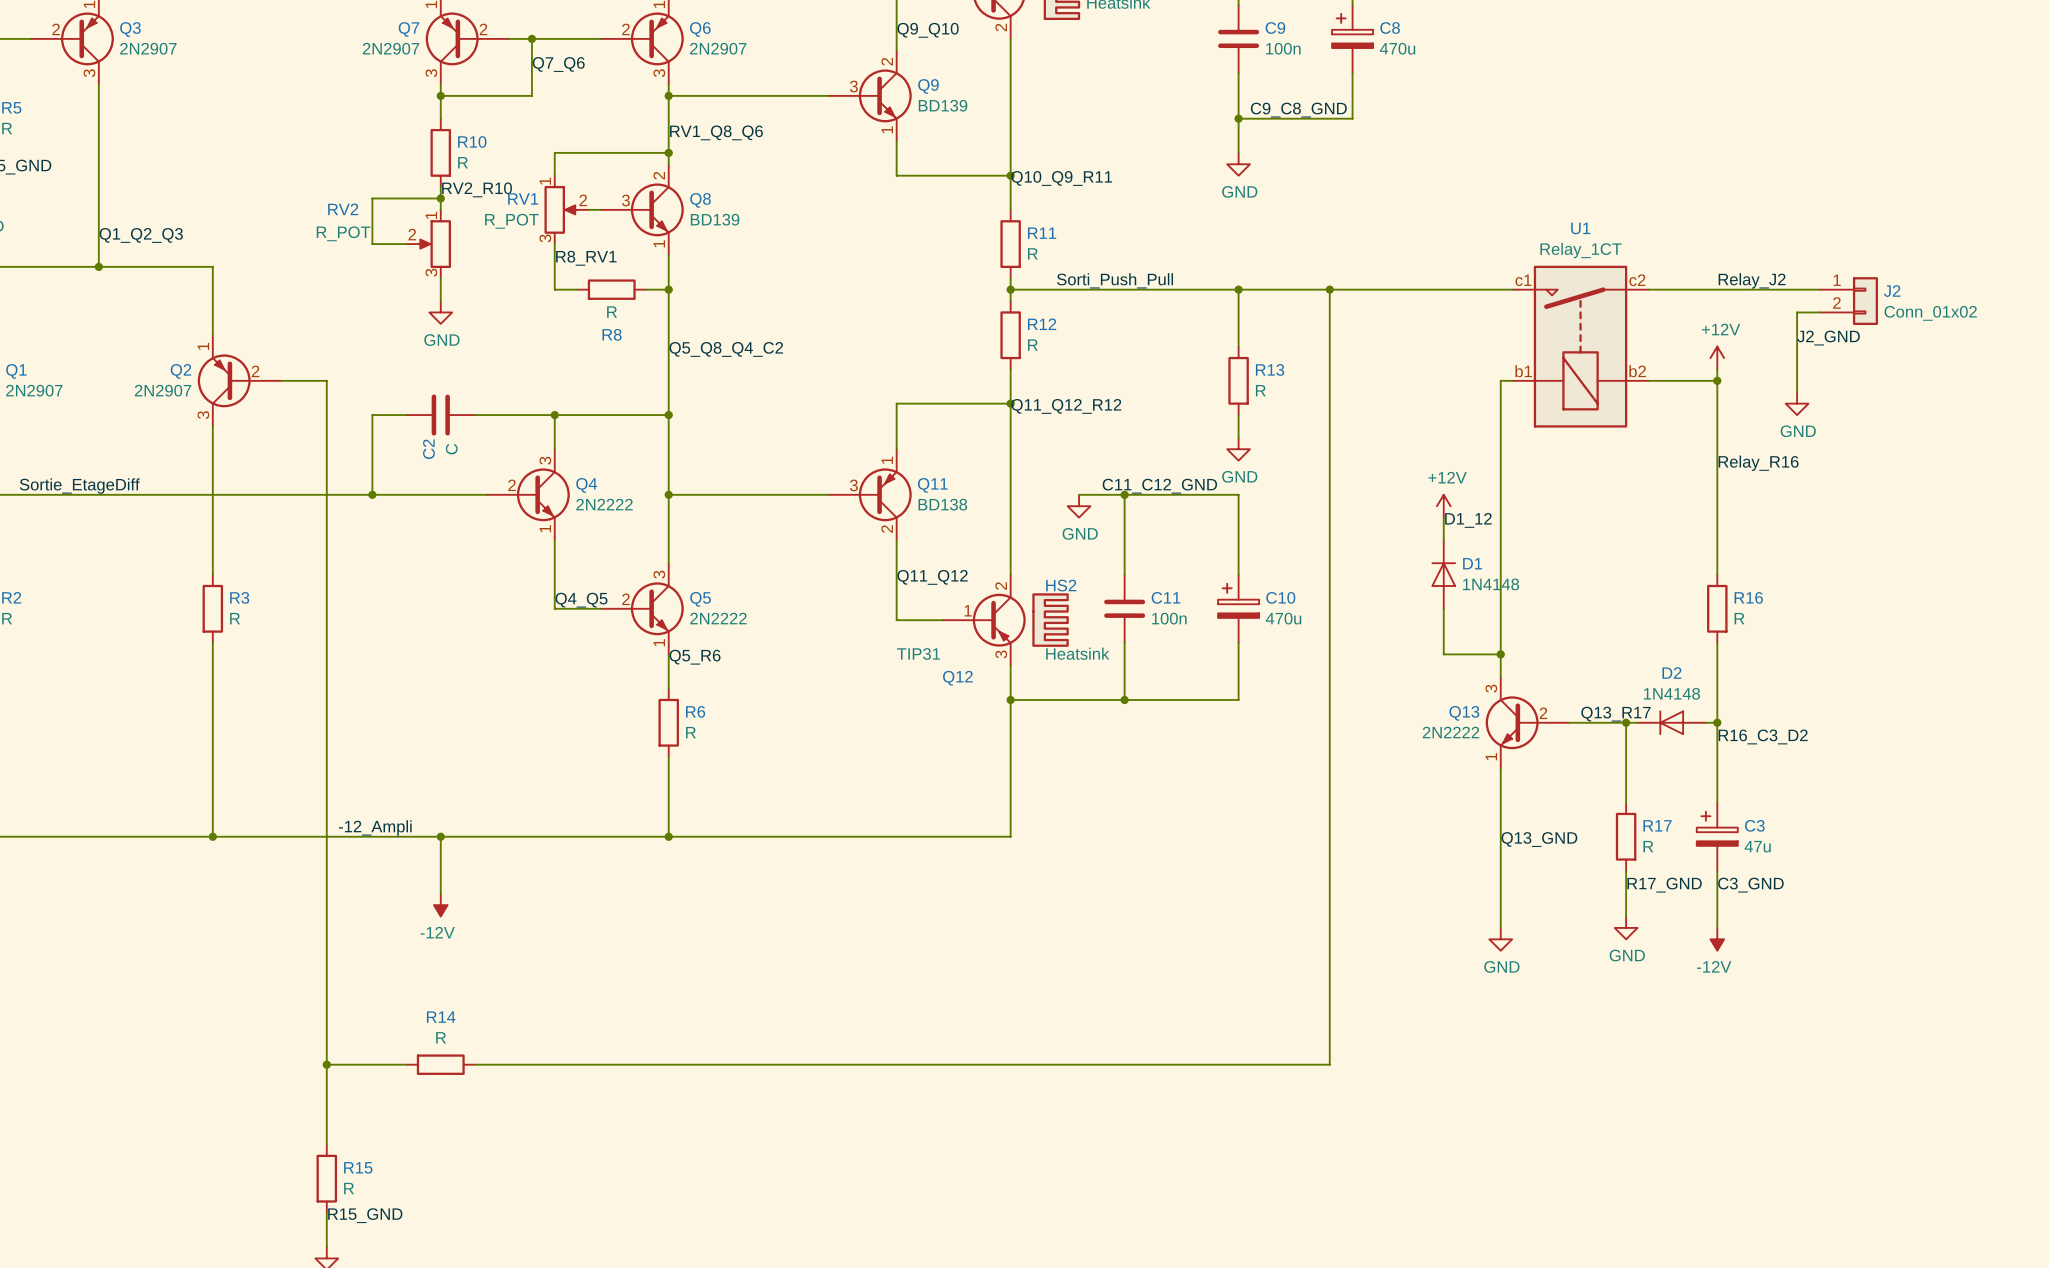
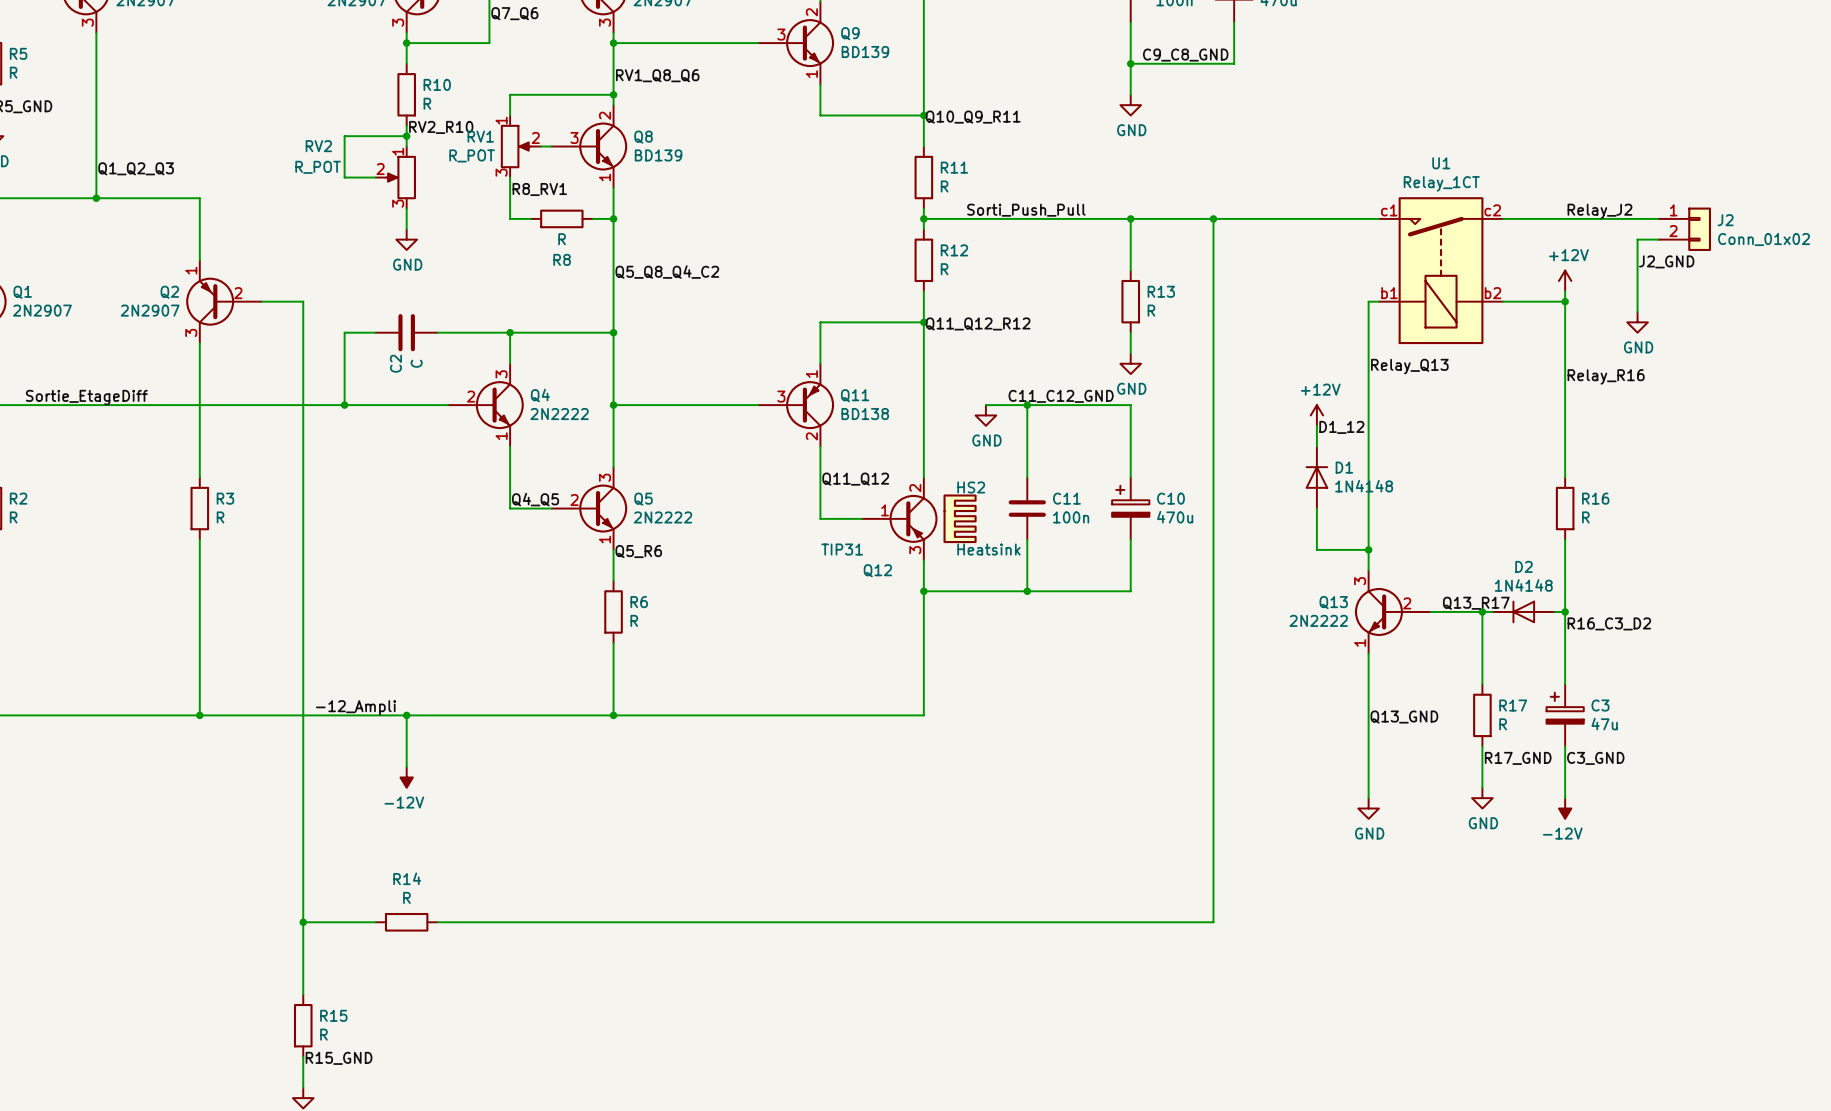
label: none -> Relay_Q13 (1409, 366)

